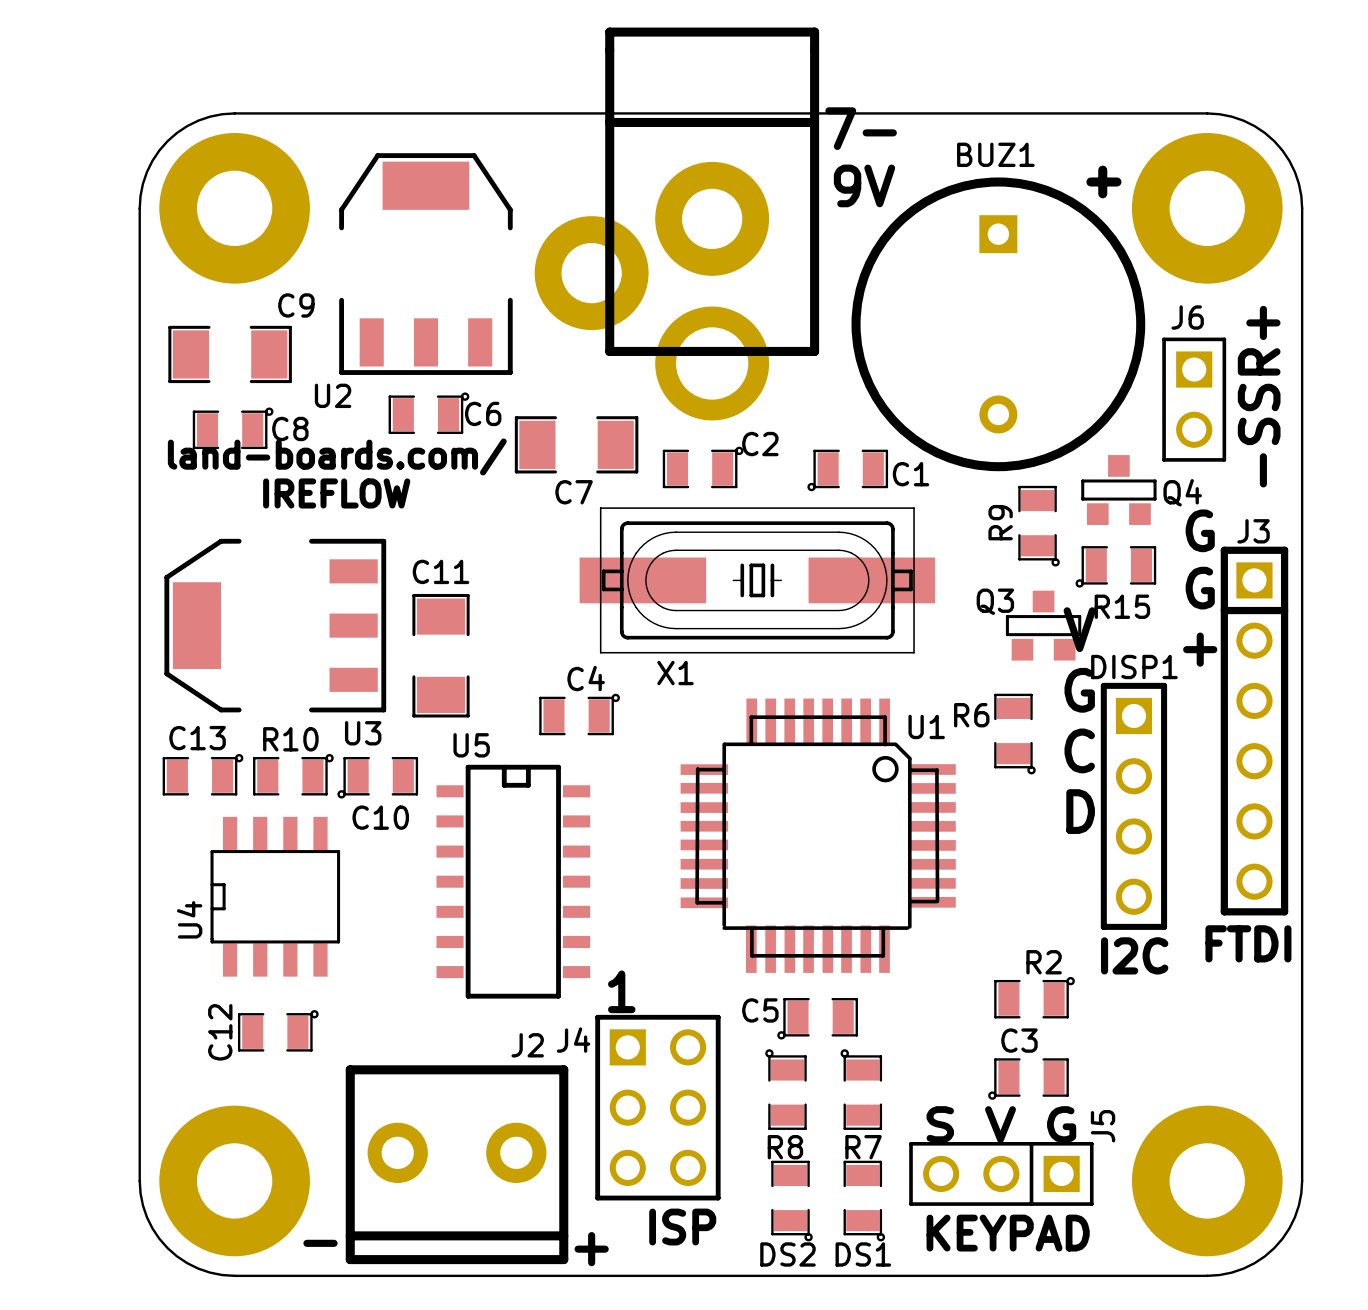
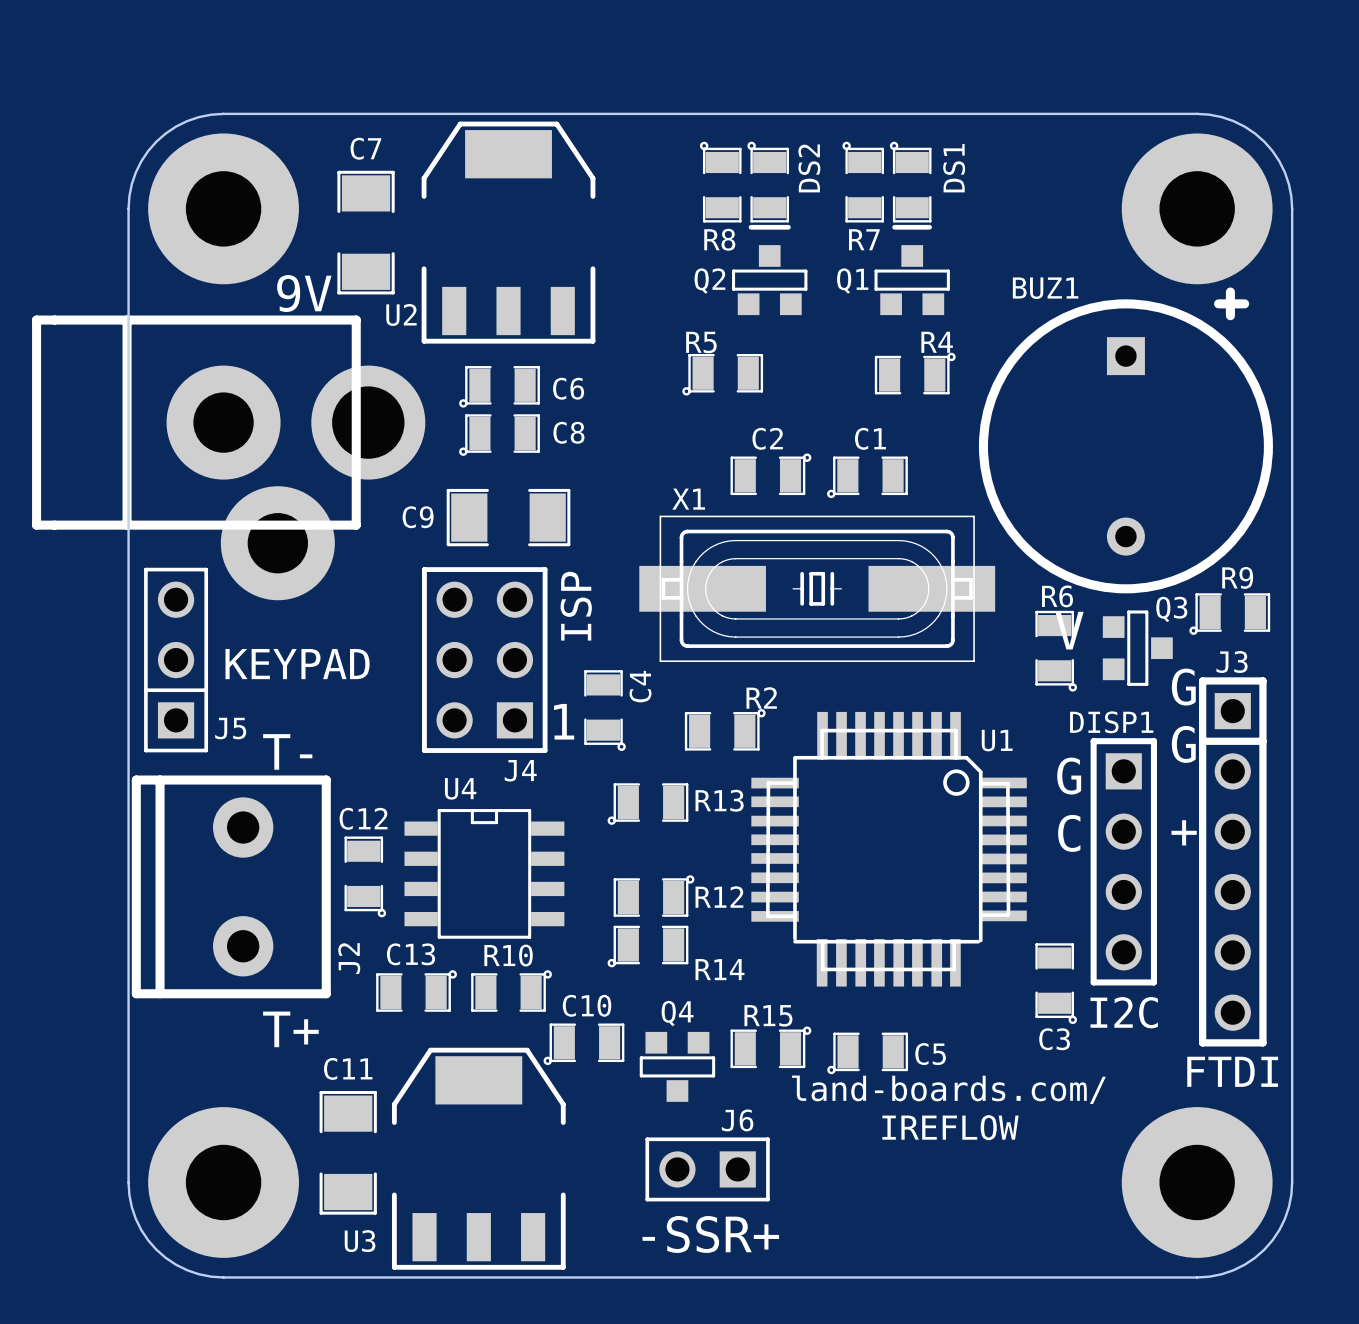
text: 7- (861, 128) -> none
BUZ1 name position: BUZ1 (995, 154) -> BUZ1 (1045, 288)
text position: 9V (864, 185) -> 9V (304, 293)
part rotation: 0° (676, 224) -> 90° counterclockwise (228, 457)
part position: (676, 224) -> (228, 457)
line: none -> (751, 227) (788, 227)
line: none -> (894, 227) (929, 227)
U2 position: (425, 264) -> (508, 232)
Q2: none -> (769, 280)
Q1: none -> (912, 280)
C9 name position: C9 (296, 305) -> C9 (418, 517)
J6 name position: J6 (1187, 317) -> J6 (737, 1120)
BUZ1 position: (998, 318) -> (1125, 440)
C9 position: (230, 354) -> (508, 517)
R4: none -> (915, 373)
R5: none -> (722, 374)
U2 name position: U2 (333, 395) -> U2 (401, 314)
text: -SSR+ (1259, 396) -> none
J6 rotation: 0° (1194, 399) -> 90° clockwise (707, 1169)
J6 position: (1194, 399) -> (707, 1169)
C6 rotation: 0° (428, 413) -> 180° (499, 386)
C6 position: (428, 413) -> (499, 386)
C8 rotation: 0° (233, 428) -> 180° (499, 435)
C8 position: (233, 428) -> (499, 435)
C7 rotation: 0° (576, 444) -> 90° clockwise (366, 232)
C7 position: (576, 444) -> (366, 232)
C2 name position: C2 (760, 444) -> C2 (767, 438)
text: land-boards.com/ (337, 456) -> none
C2 position: (703, 467) -> (770, 474)
C1 position: (847, 470) -> (867, 477)
C1 name position: C1 (911, 474) -> C1 (870, 438)
Q4 rotation: 0° (1118, 490) -> 180° (677, 1066)
Q4 position: (1118, 490) -> (677, 1066)
C7 name position: C7 (574, 492) -> C7 (365, 148)
Q4 name position: Q4 (1182, 492) -> Q4 (677, 1013)
text: IREFLOW (336, 493) -> none
R9 rotation: 0° (1039, 526) -> 90° clockwise (1229, 614)
R9 position: (1039, 526) -> (1229, 614)
text: G (1200, 530) -> none
R15 rotation: 0° (1115, 566) -> 180° (770, 1047)
R15 position: (1115, 566) -> (770, 1047)
X1 position: (757, 580) -> (817, 588)
text: G (1200, 588) -> none
text: none -> ISP (576, 606)
U3 rotation: 0° (275, 625) -> 90° clockwise (478, 1158)
U3 position: (275, 625) -> (478, 1158)
Q3 rotation: 0° (1043, 625) -> 90° clockwise (1137, 648)
Q3 position: (1043, 625) -> (1137, 648)
text position: + (1200, 649) -> + (1184, 832)
C11 position: (441, 655) -> (348, 1152)
text: none -> KEYPAD (297, 664)
DISP1 name position: DISP1 (1134, 667) -> DISP1 (1111, 722)
X1 name position: X1 (675, 673) -> X1 (688, 499)
text: none -> G (1183, 687)
text: G (1079, 690) -> none
C4 rotation: 0° (579, 714) -> 90° clockwise (605, 710)
R6 name position: R6 (971, 715) -> R6 (1057, 596)
J3 position: (1254, 731) -> (1232, 861)
R6 position: (1014, 734) -> (1056, 651)
text: none -> G (1183, 744)
text: none -> T- (287, 751)
text position: C (1079, 750) -> C (1069, 833)
C13 position: (203, 774) -> (416, 991)
R10 position: (293, 774) -> (511, 991)
text: none -> G (1069, 776)
C10 position: (377, 777) -> (583, 1044)
R13: none -> (647, 804)
DISP1 position: (1133, 806) -> (1123, 861)
text: D (1080, 811) -> none
C10 name position: C10 (380, 817) -> C10 (587, 1005)
U1 position: (818, 835) -> (889, 849)
U5: (513, 881) -> none
R12: none -> (654, 896)
U4 rotation: 0° (275, 896) -> 90° clockwise (484, 873)
U4 position: (275, 896) -> (484, 873)
text position: FTDI (1248, 943) -> FTDI (1232, 1071)
R14: none -> (647, 946)
text position: I2C (1134, 955) -> I2C (1124, 1012)
R2 name position: R2 (1044, 962) -> R2 (761, 697)
text position: 1 (621, 991) -> 1 (564, 721)
R2 position: (1034, 997) -> (725, 729)
C5 name position: C5 (760, 1010) -> C5 (930, 1054)
C5 position: (817, 1018) -> (867, 1053)
text: none -> T+ (290, 1029)
C12 rotation: 0° (278, 1030) -> 90° clockwise (365, 876)
C12 position: (278, 1030) -> (365, 876)
J4 name position: J4 (573, 1040) -> J4 (520, 770)
C3 name position: C3 (1019, 1040) -> C3 (1054, 1039)
C3 rotation: 0° (1028, 1079) -> 90° counterclockwise (1056, 983)
C3 position: (1028, 1079) -> (1056, 983)
R8 position: (785, 1089) -> (720, 182)
R7 position: (861, 1089) -> (863, 182)
text: none -> land-boards.com/ (948, 1089)
J4 rotation: 0° (657, 1107) -> 180° (484, 660)
J4 position: (657, 1107) -> (484, 660)
text: S V G (1001, 1124) -> none
text: none -> IREFLOW (950, 1127)
J2 rotation: 0° (457, 1164) -> 90° clockwise (231, 886)
J2 position: (457, 1164) -> (231, 886)
J5 rotation: 0° (1001, 1173) -> 90° clockwise (176, 660)
J5 position: (1001, 1173) -> (176, 660)
DS2 rotation: 0° (792, 1201) -> 180° (768, 182)
DS2 position: (792, 1201) -> (768, 182)
DS1 rotation: 0° (864, 1201) -> 180° (910, 182)
DS1 position: (864, 1201) -> (910, 182)
text: ISP (682, 1227) -> none
text: none -> -SSR+ (710, 1234)
text: KEYPAD (1008, 1233) -> none
text: - (320, 1243) -> none
text: + (591, 1249) -> none
DS2 name position: DS2 (787, 1254) -> DS2 (809, 168)
DS1 name position: DS1 (863, 1254) -> DS1 (954, 168)

